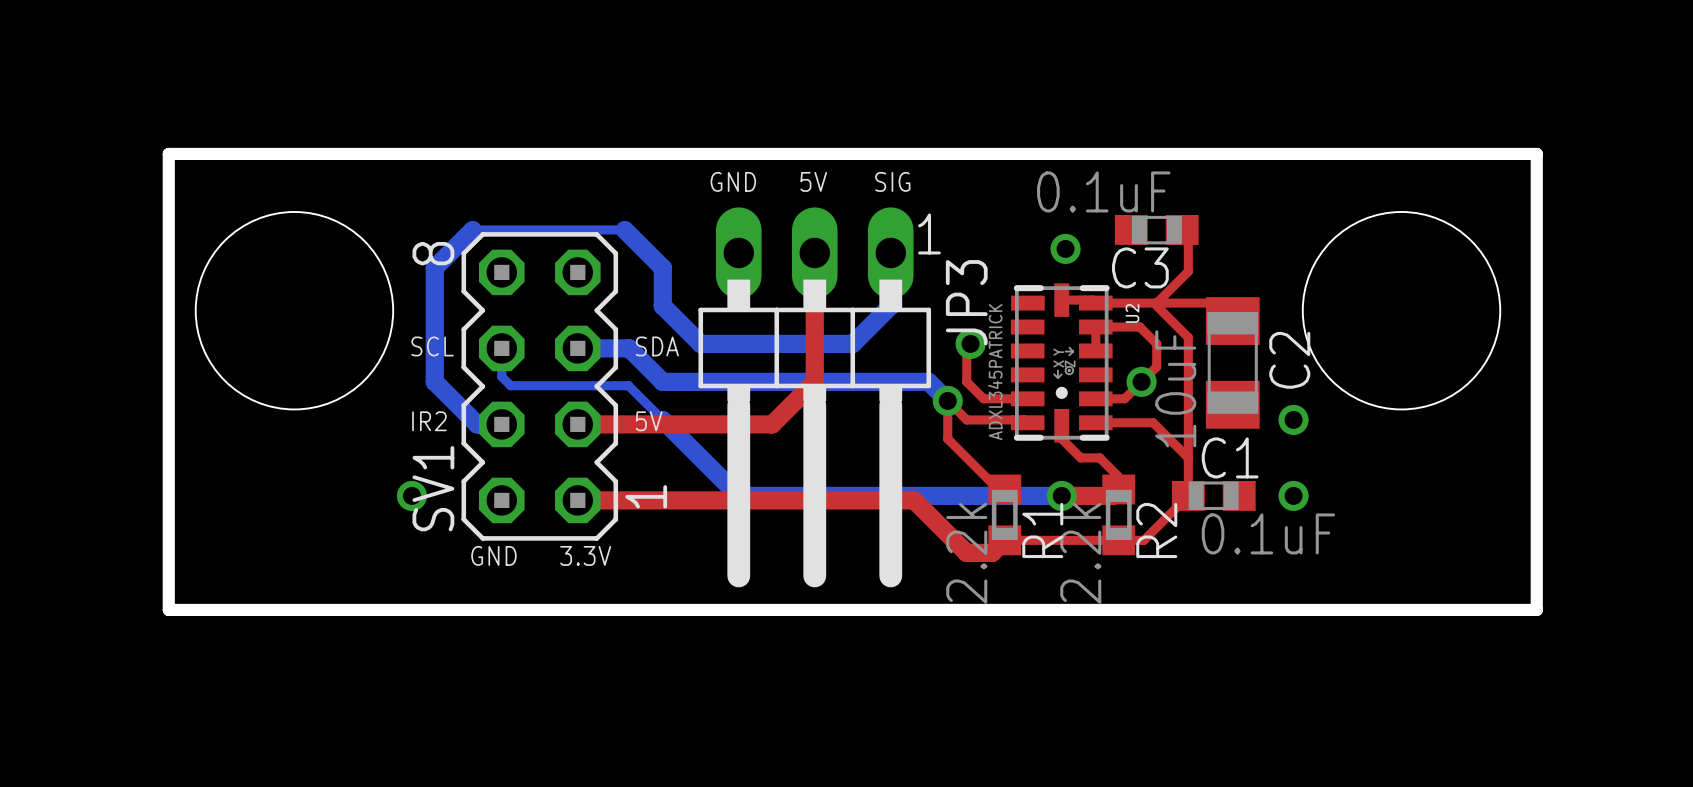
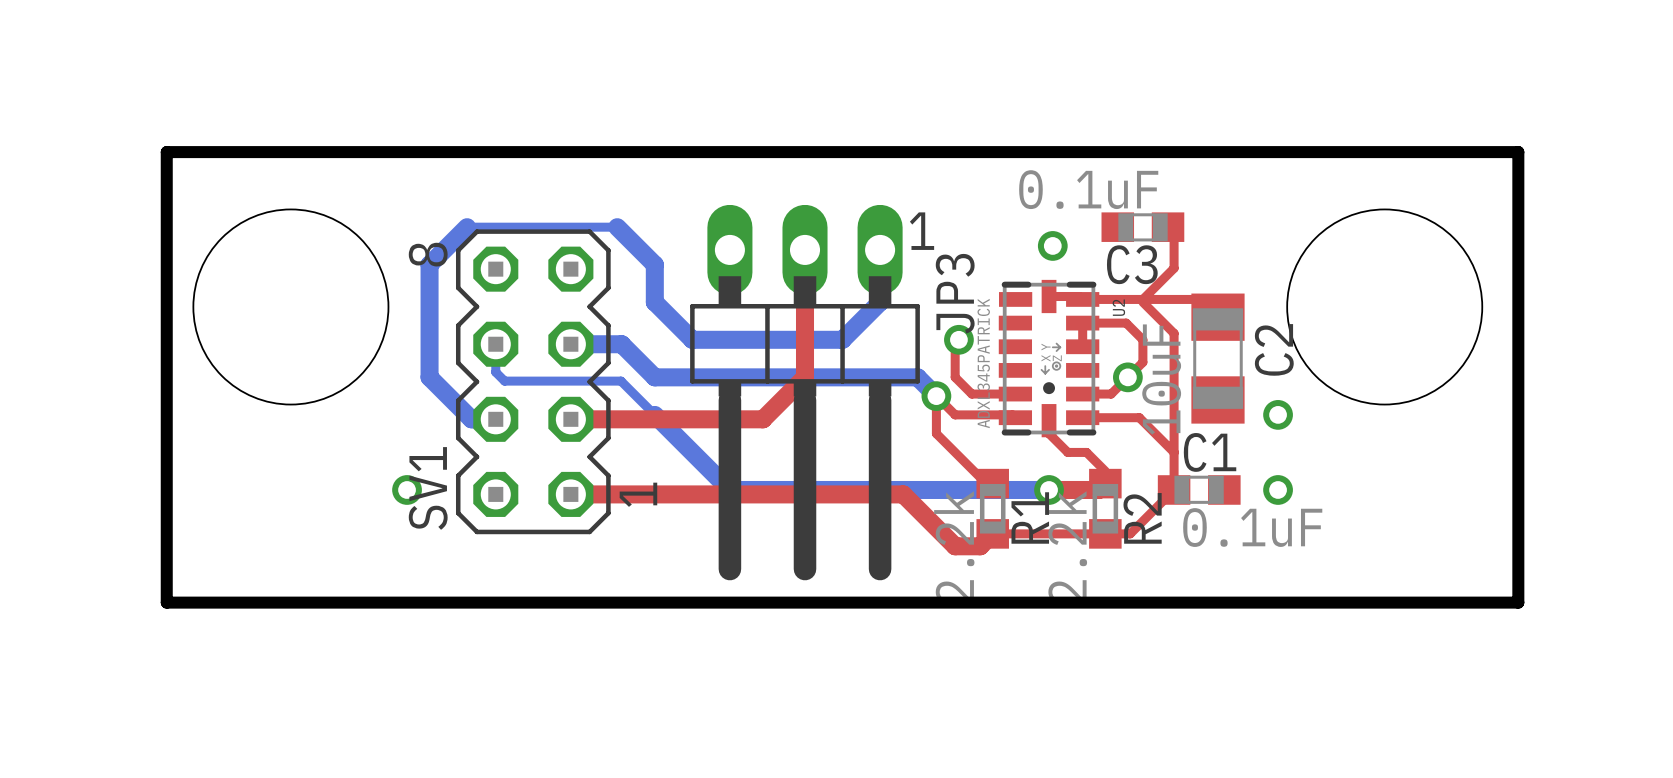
text: GND (733, 181) -> none
text: 5V (813, 181) -> none
text: SIG (892, 181) -> none
text: SCL (432, 346) -> none
text: SDA (657, 346) -> none
text: IR2 (429, 421) -> none
text: 5V (649, 421) -> none
text: GND (493, 555) -> none
text: 3.3V (585, 555) -> none

